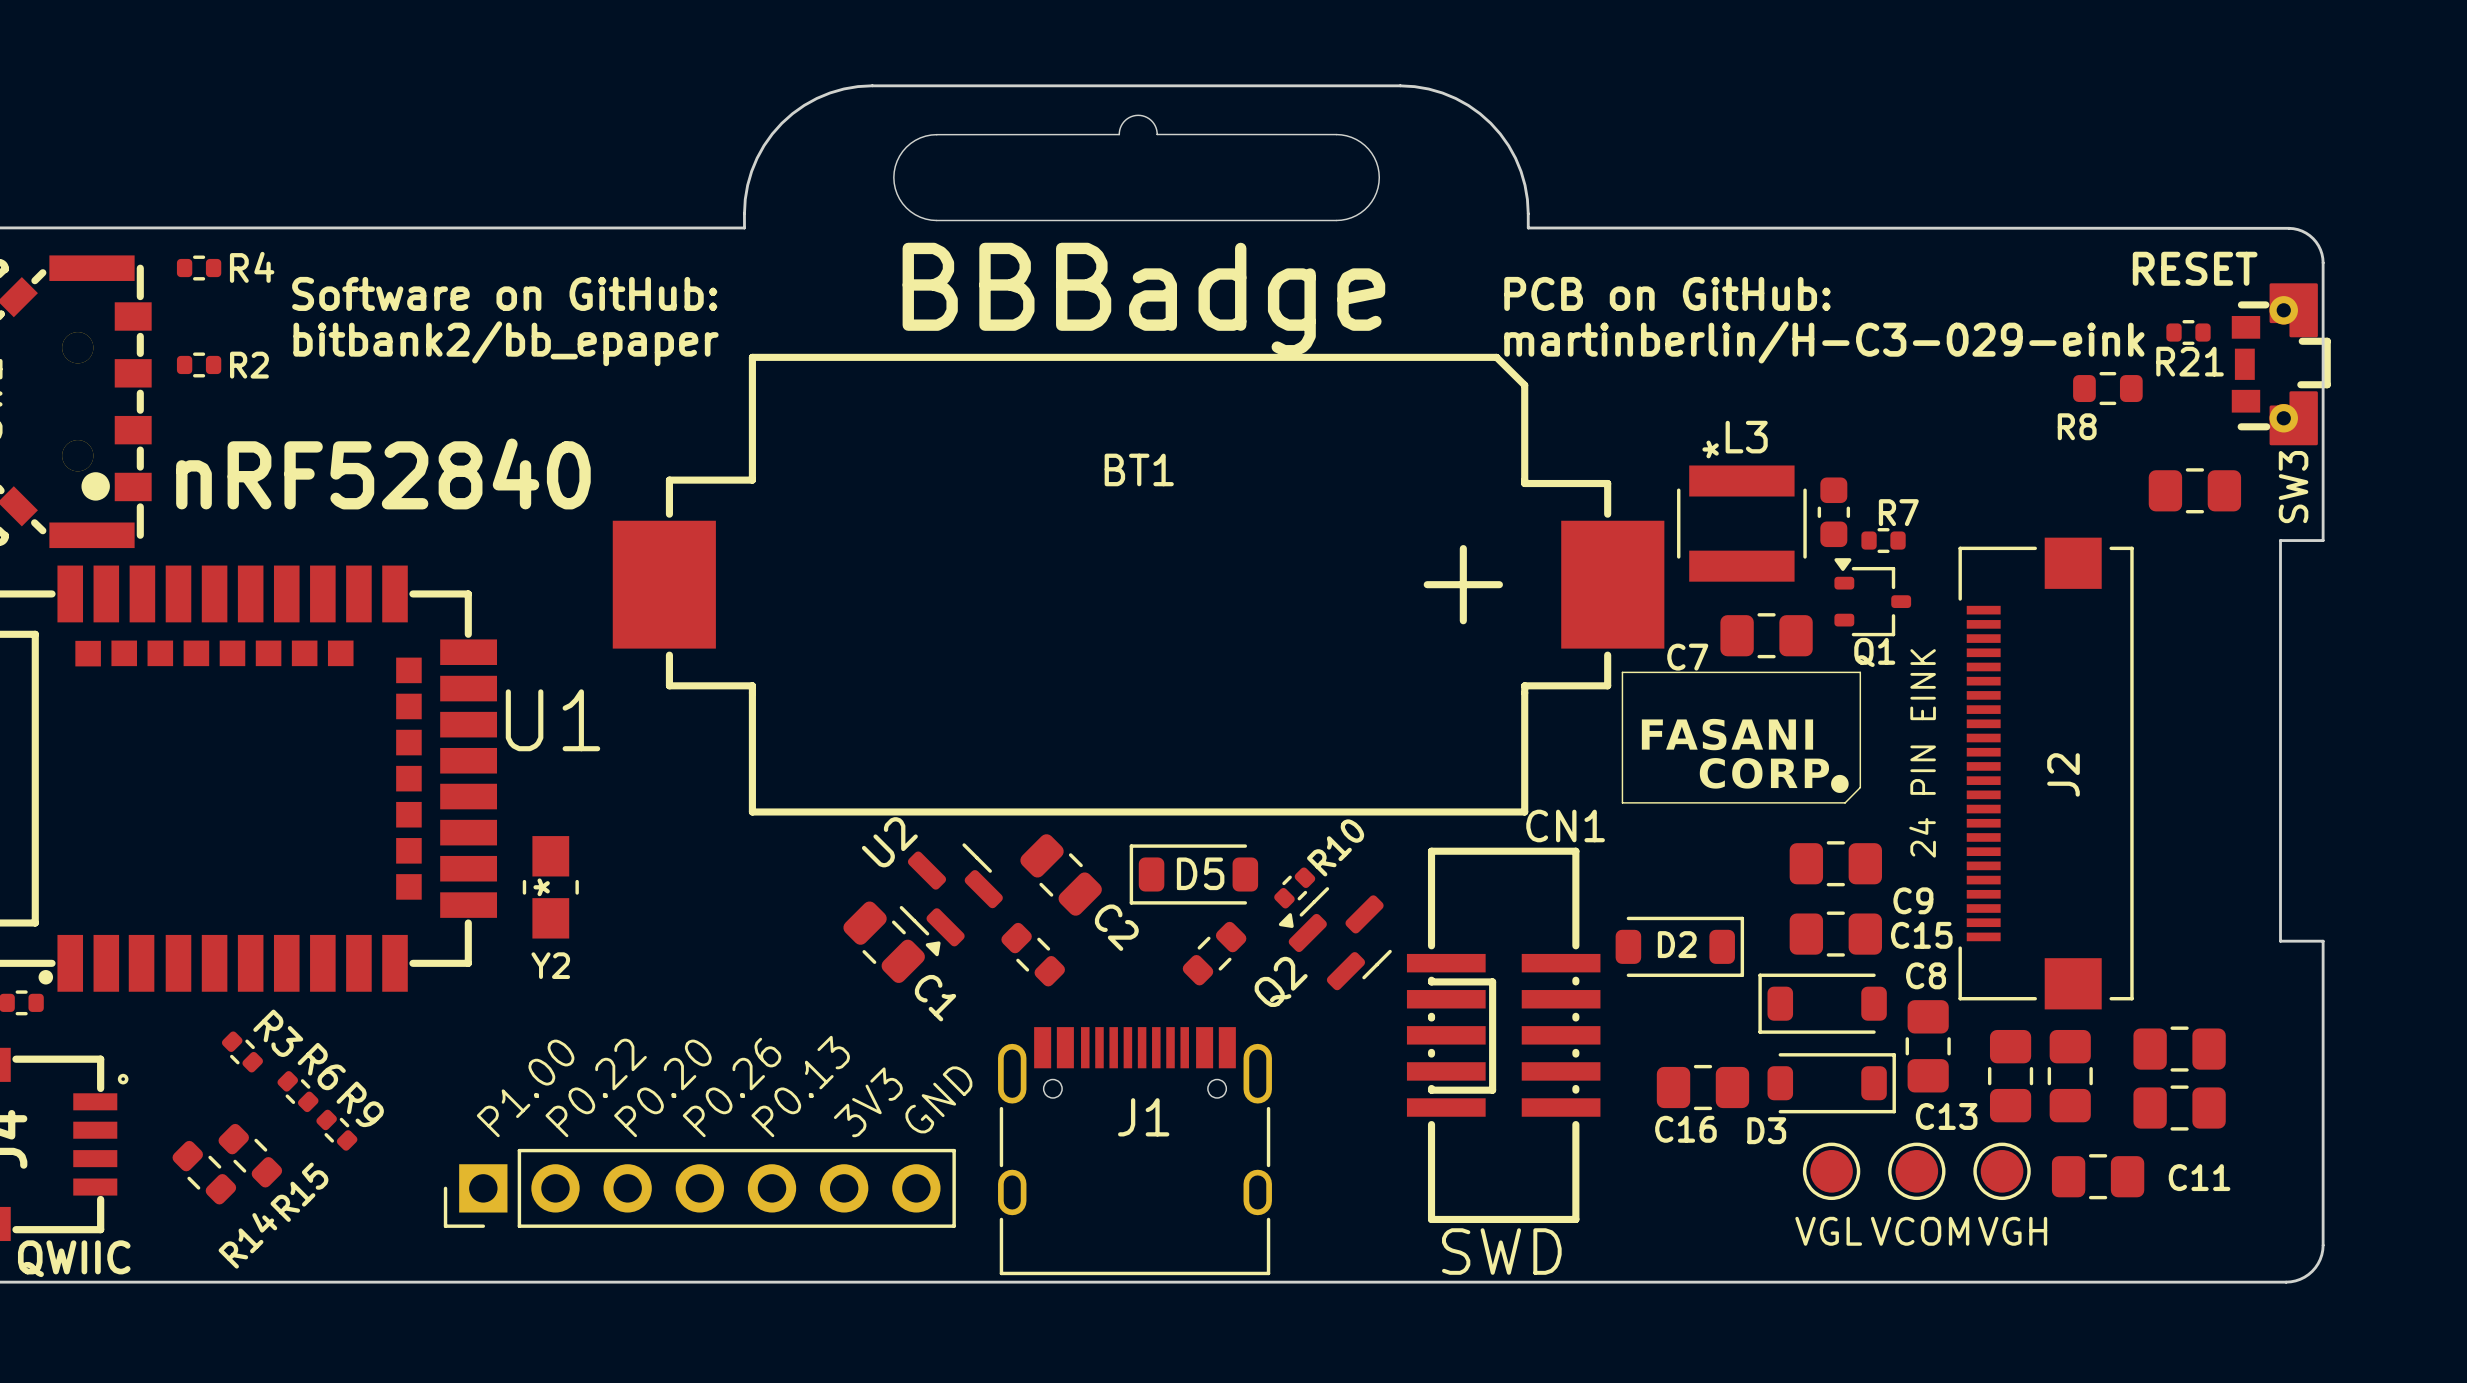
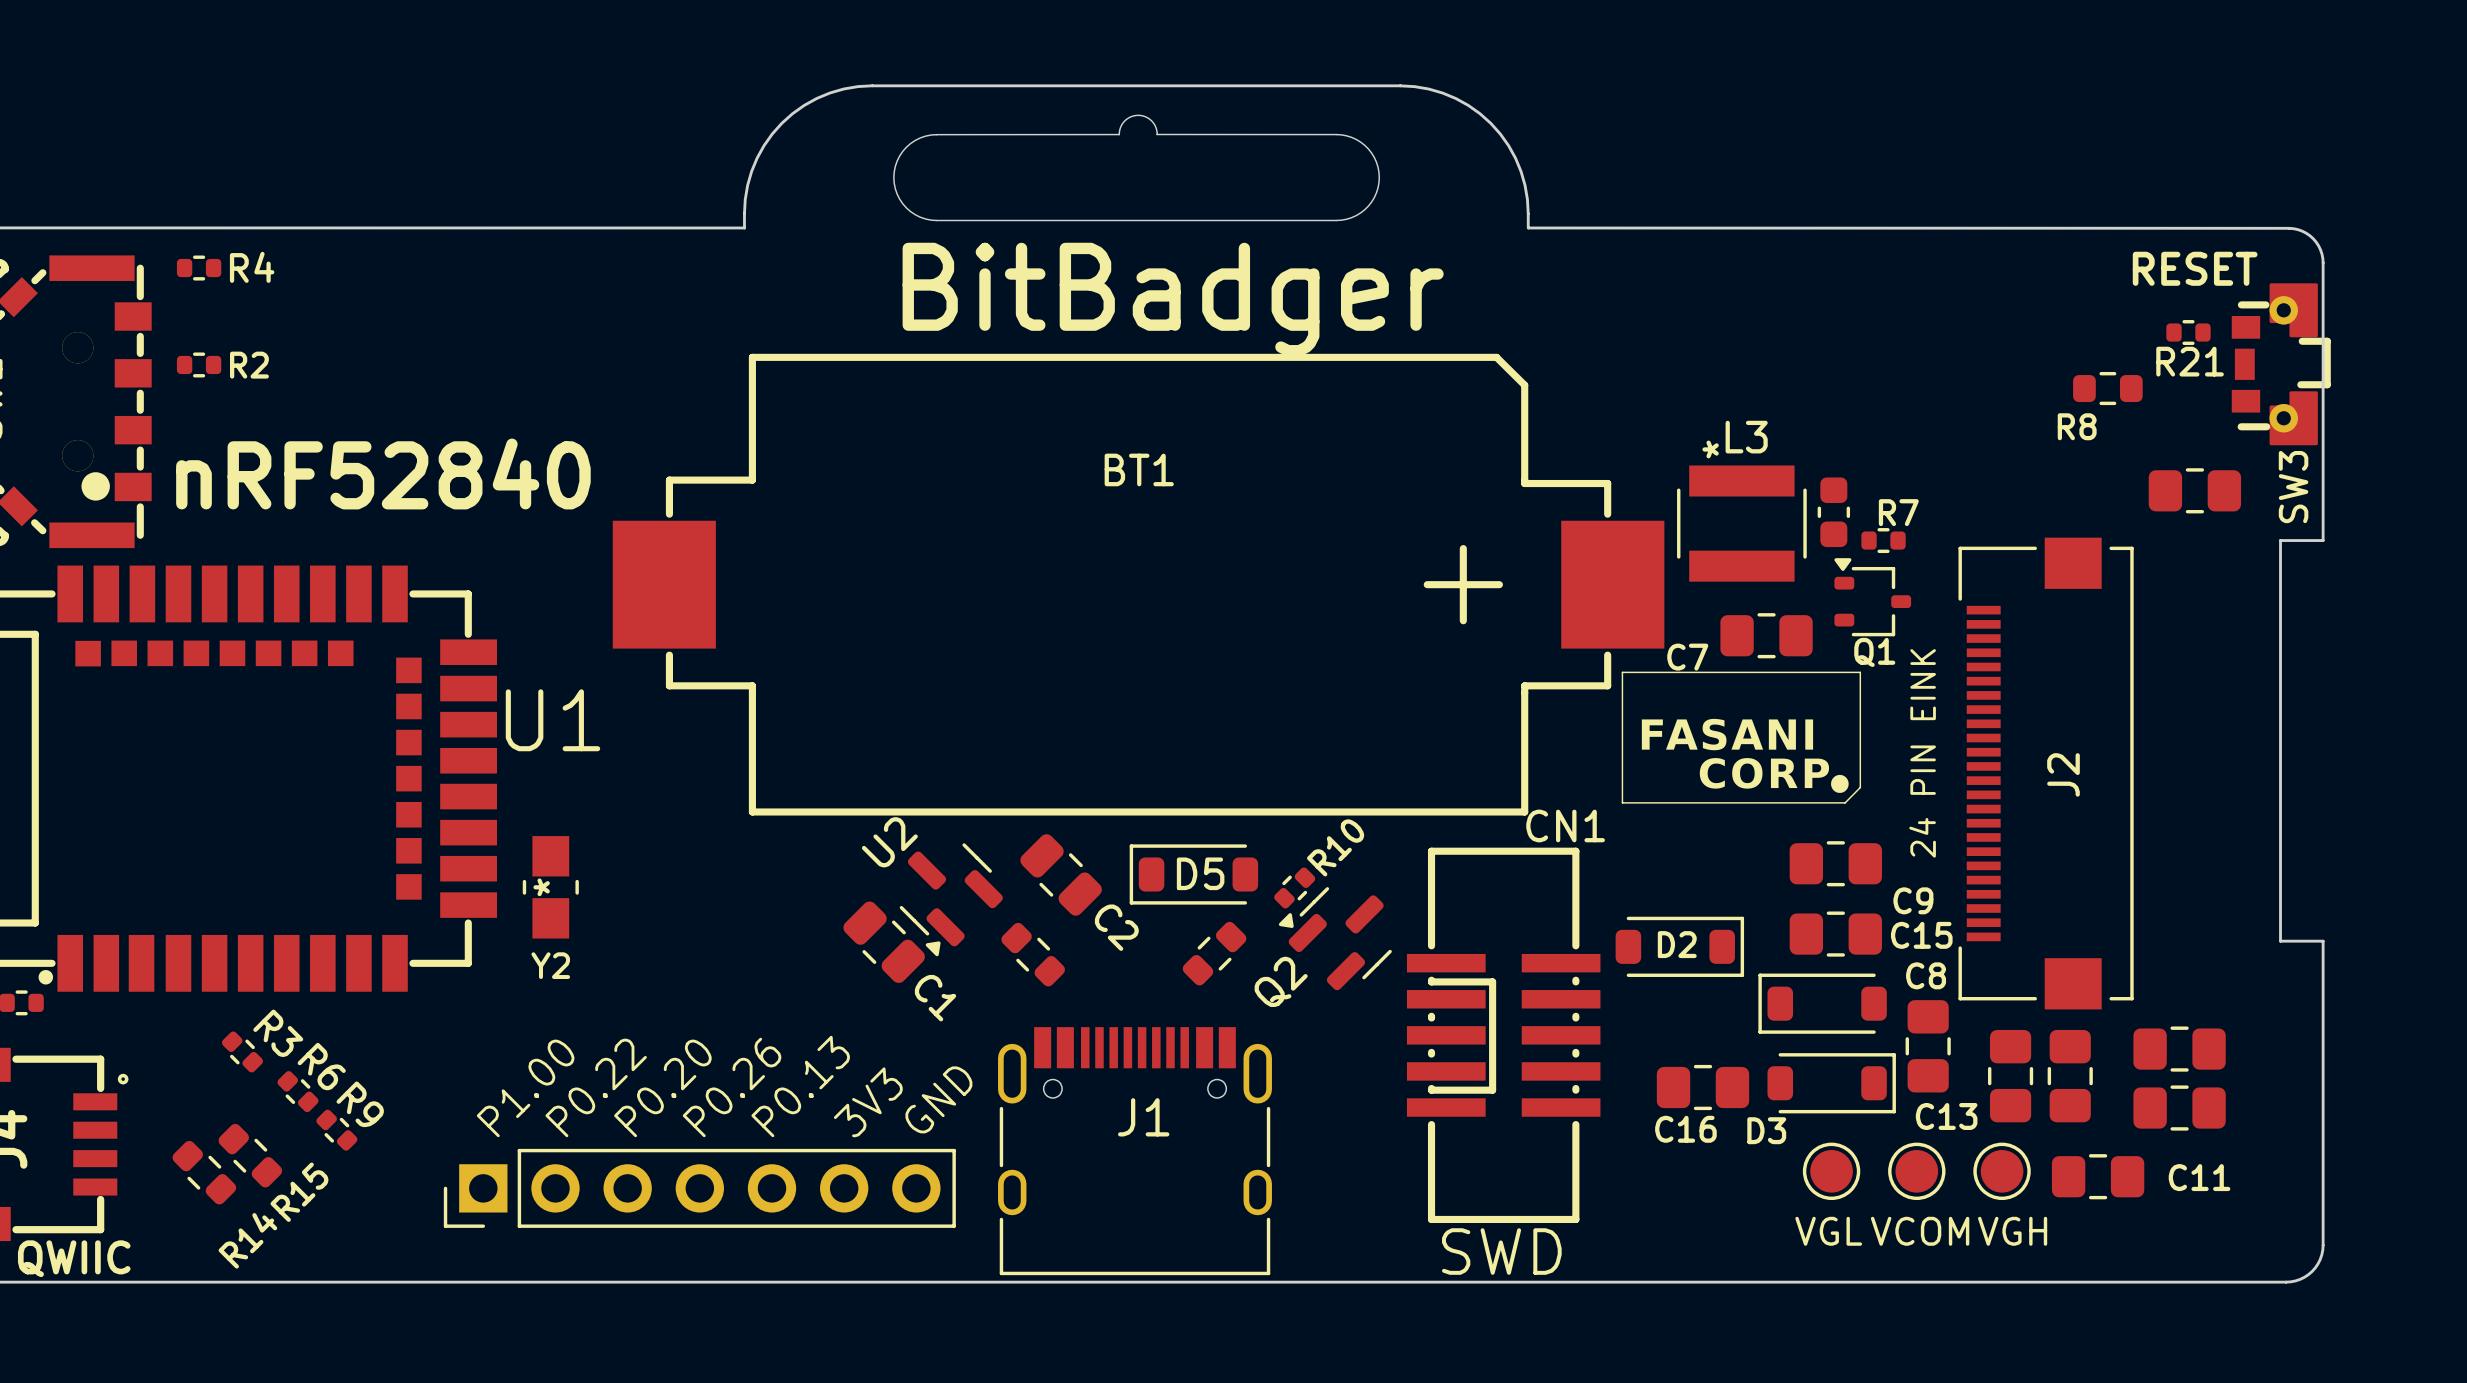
text: Software on GitHub: (504, 293) -> none
text: PCB on GitHub: (1667, 293) -> none
text: BBBadge (1143, 299) -> BitBadger (1173, 299)
text: martinberlin/H-C3-029-eink (1824, 342) -> none
text: bitbank2/bb_epaper (506, 343) -> none

